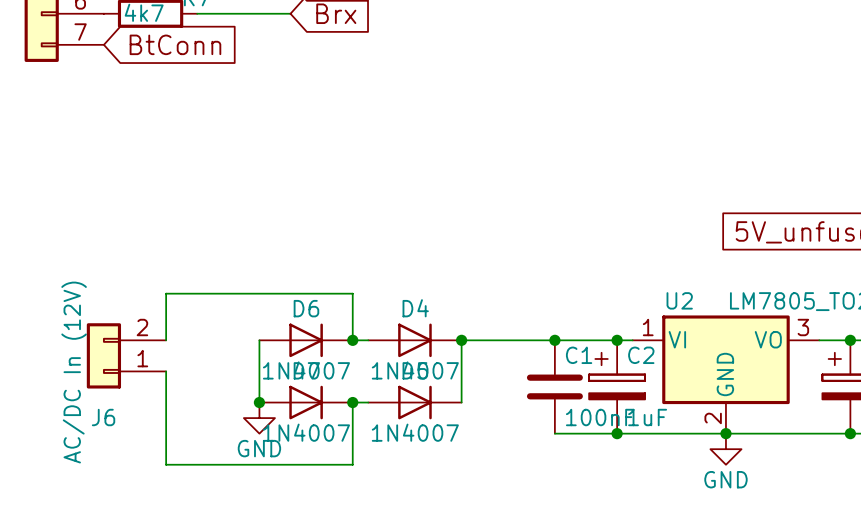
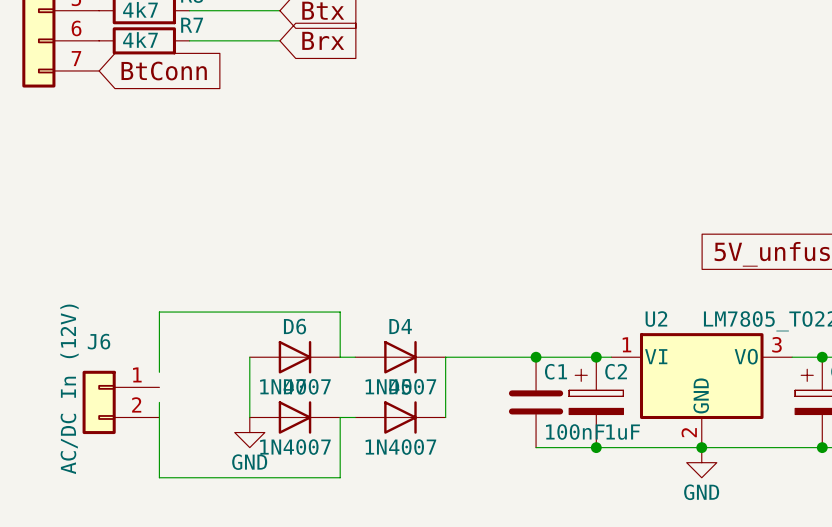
junction: (352, 340) -> none
junction: (461, 340) -> none
J6 flip: as is (103, 355) -> up-down (99, 402)
wire: (166, 371) (166, 386) -> (159, 357) (159, 372)
junction: (259, 402) -> none
junction: (352, 402) -> none

